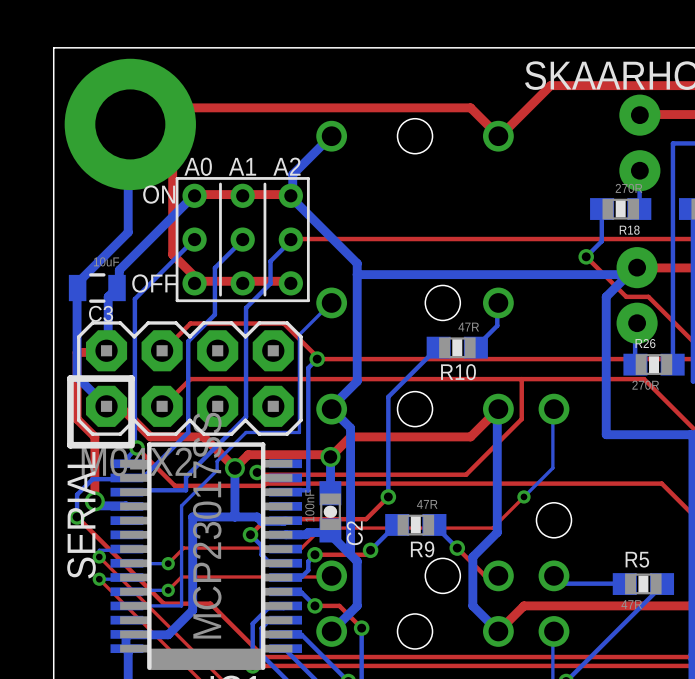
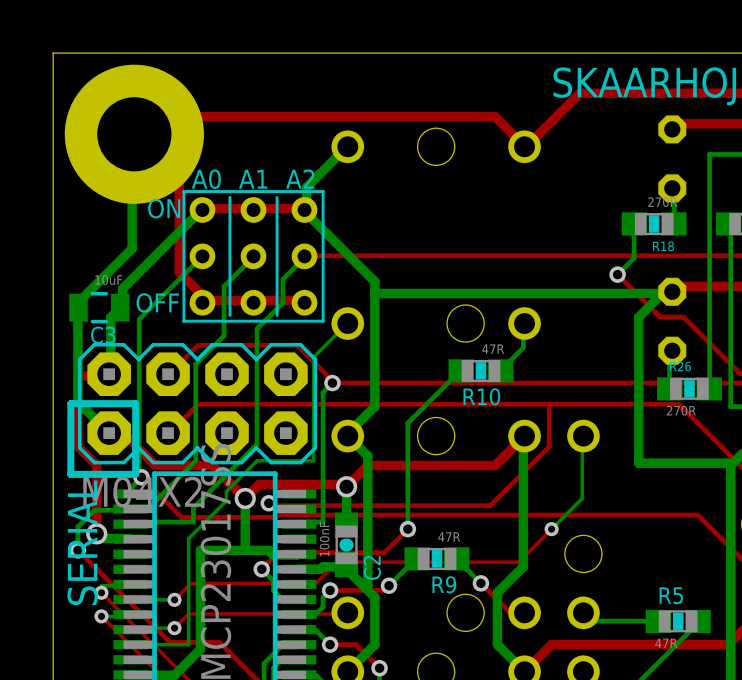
part footprint: [619, 94, 661, 192] -> [658, 115, 687, 203]
part footprint: [616, 247, 658, 344] -> [658, 277, 687, 365]

